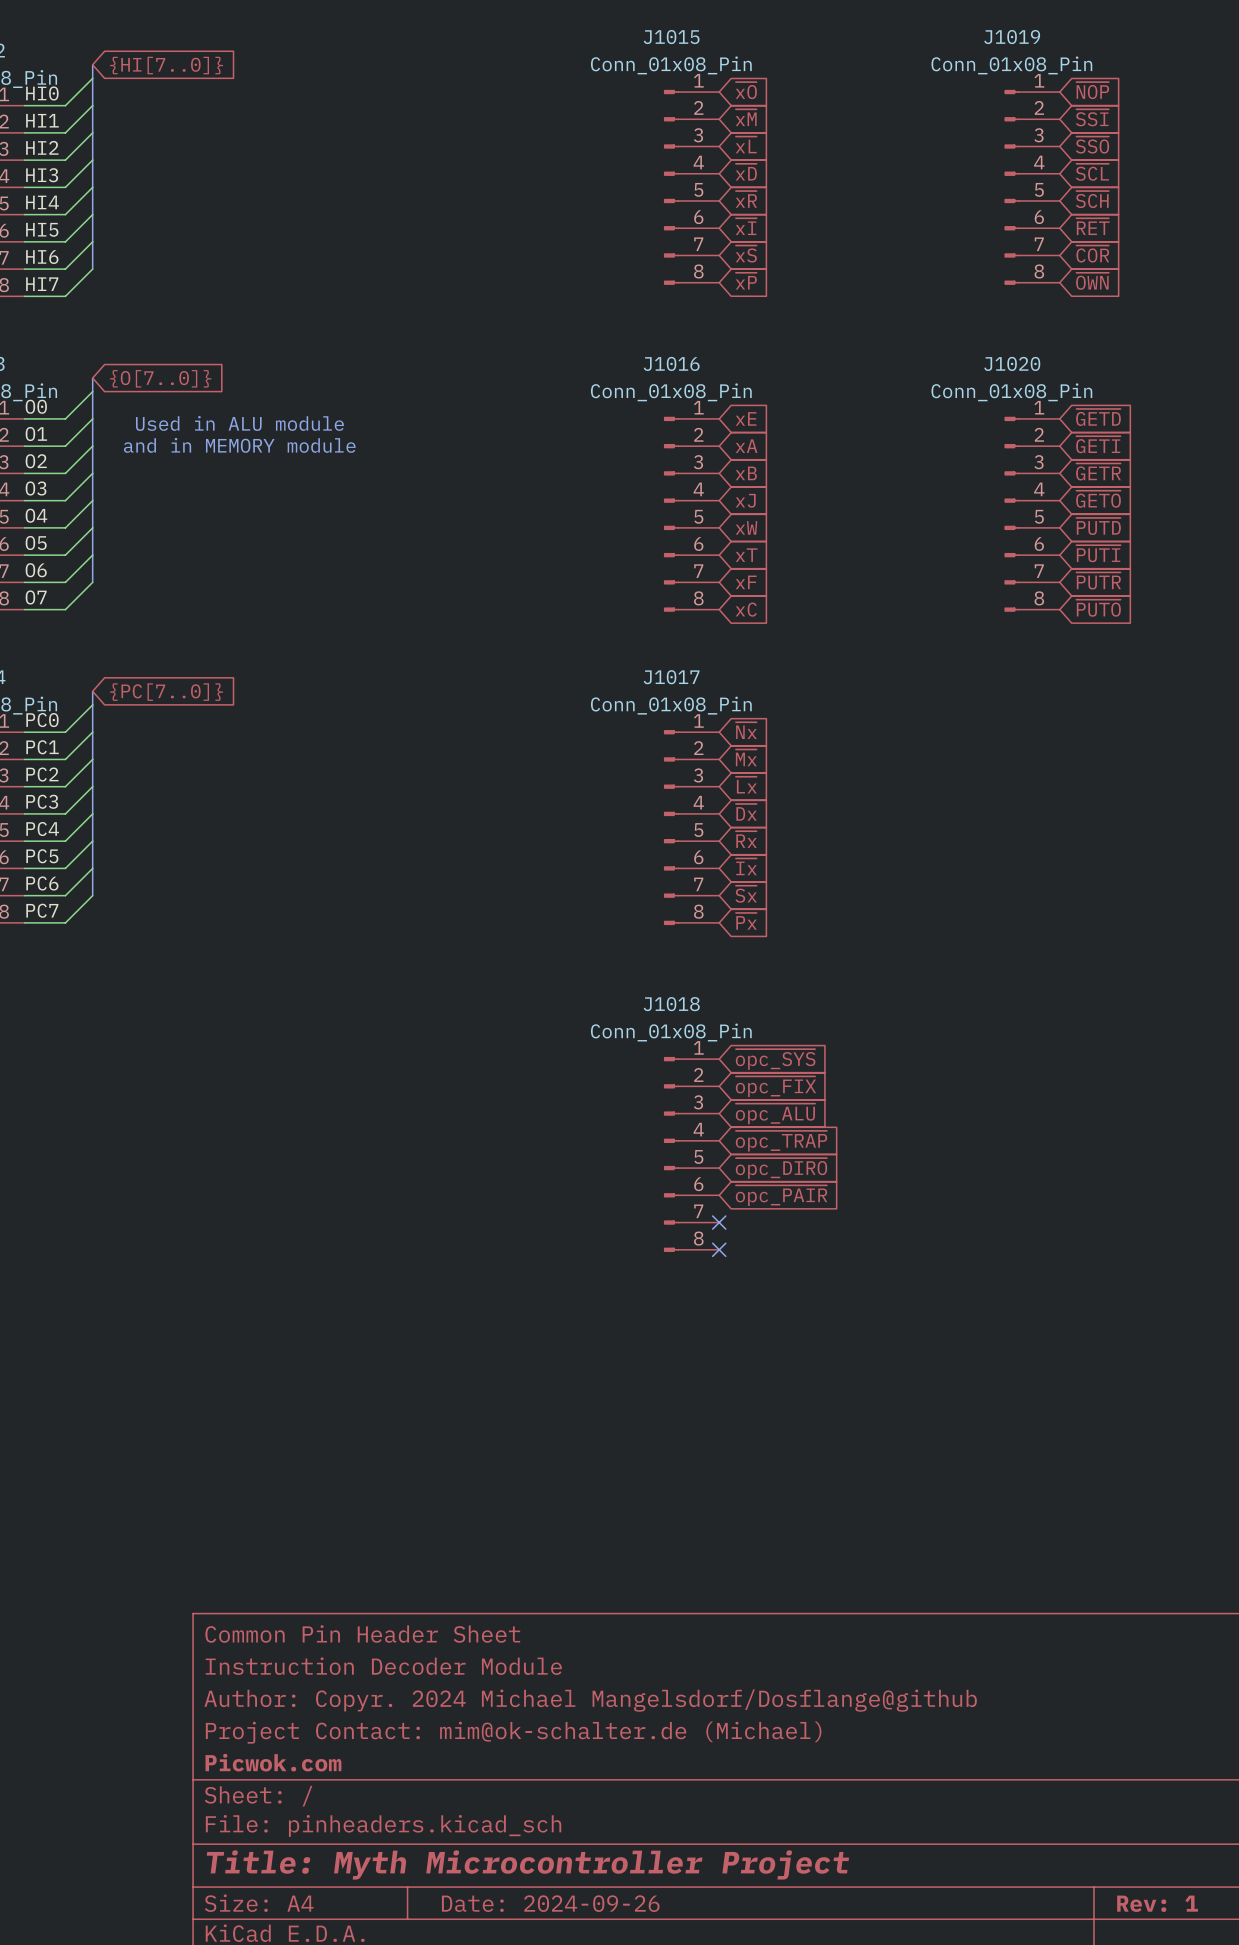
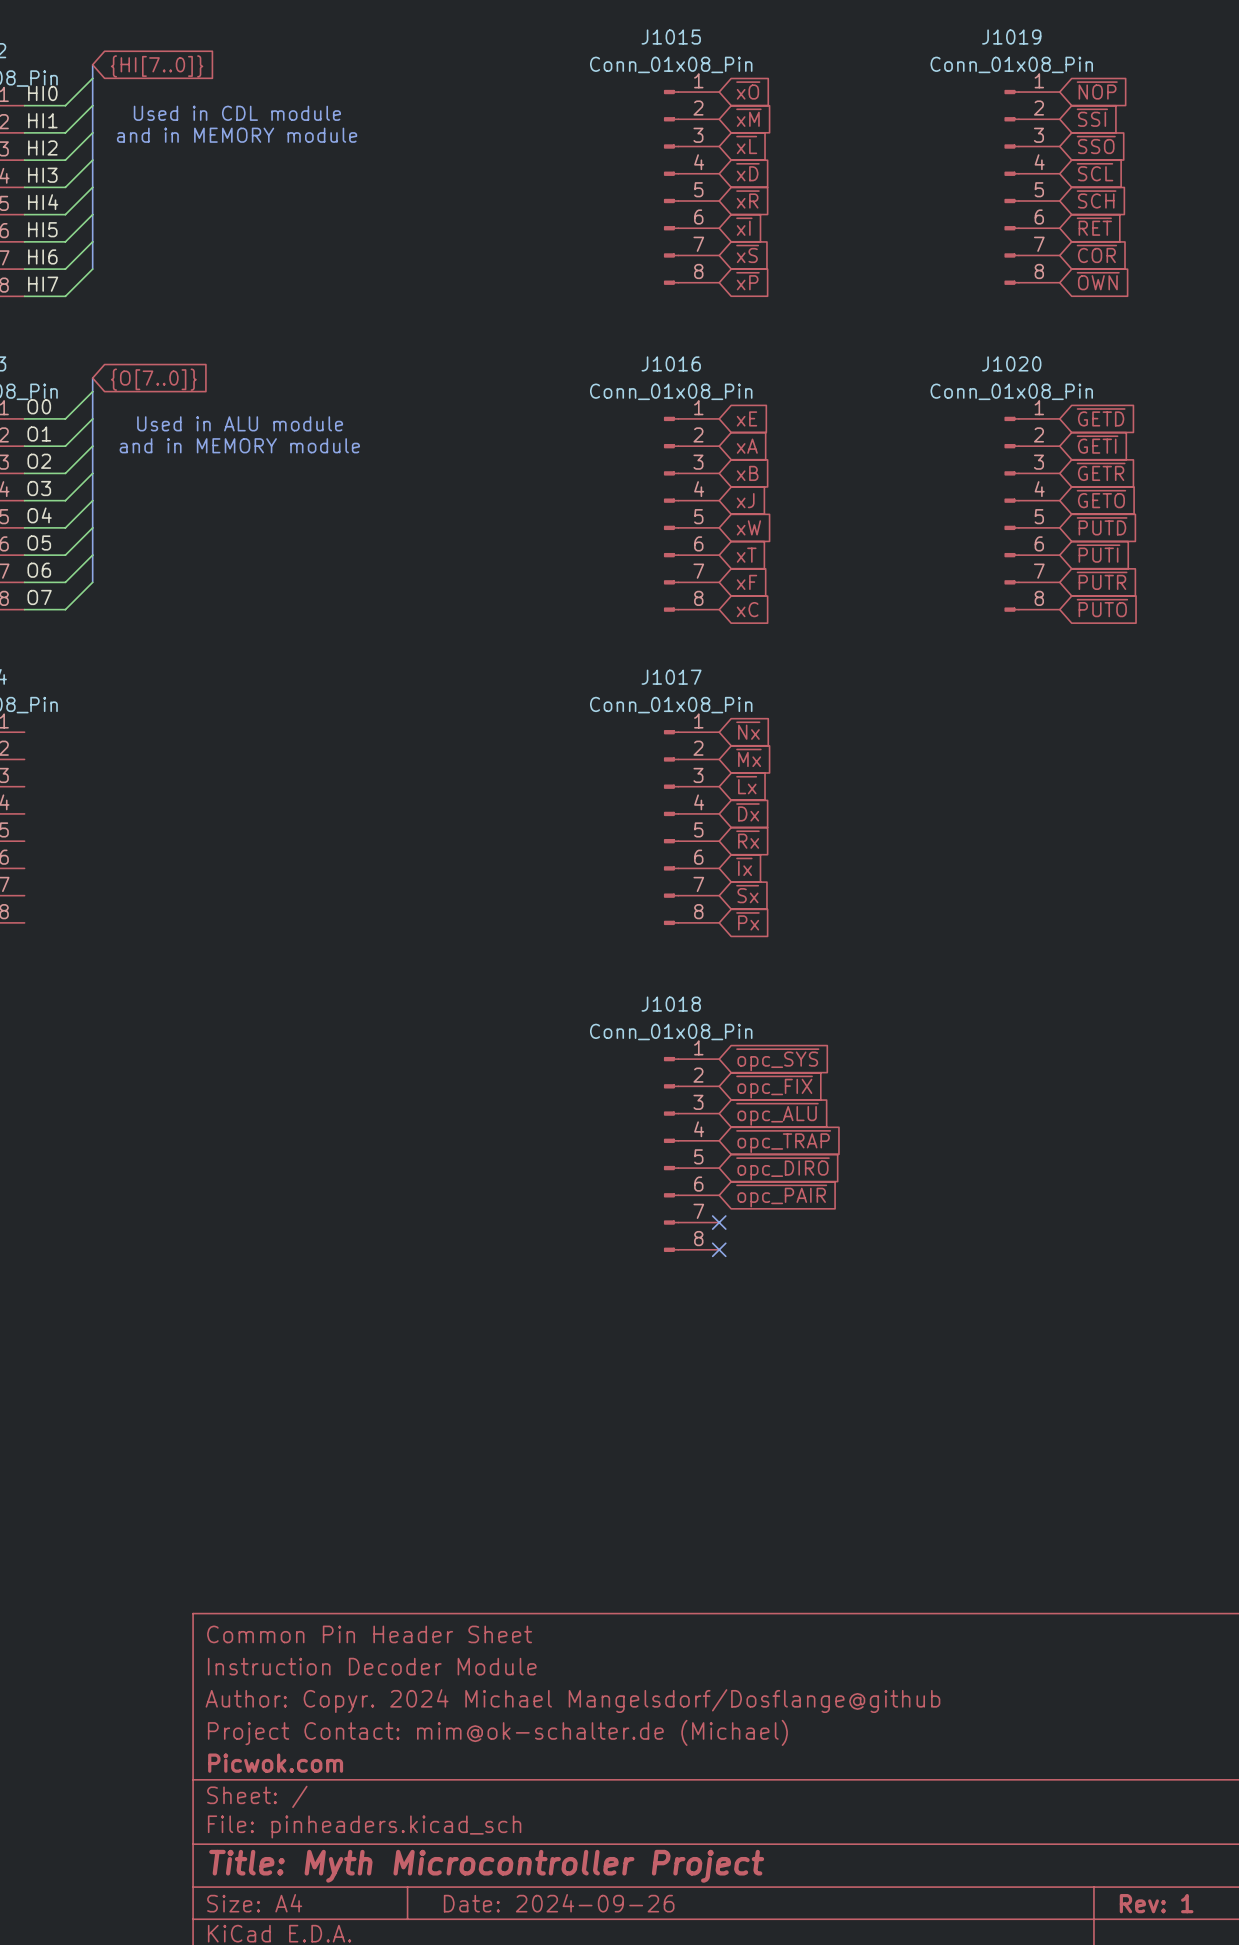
text: none -> Used in CDL module (237, 113)
text: none -> and in MEMORY module (237, 135)
bus: (92, 691) (92, 895) -> none
global label: {PC[7..0]} (166, 692) -> none
wire: (92, 704) (65, 732) (24, 732) -> none
label: PC0 (42, 720) -> none
wire: (92, 732) (65, 759) (24, 759) -> none
label: PC1 (42, 747) -> none
wire: (92, 759) (65, 786) (24, 786) -> none
label: PC2 (42, 774) -> none
wire: (92, 786) (65, 813) (24, 813) -> none
label: PC3 (42, 801) -> none
wire: (92, 813) (65, 841) (24, 841) -> none
label: PC4 (42, 829) -> none
wire: (92, 841) (65, 868) (24, 868) -> none
label: PC5 (42, 856) -> none
wire: (92, 868) (65, 895) (24, 895) -> none
label: PC6 (42, 883) -> none
wire: (92, 895) (65, 922) (24, 922) -> none
label: PC7 (42, 910) -> none

